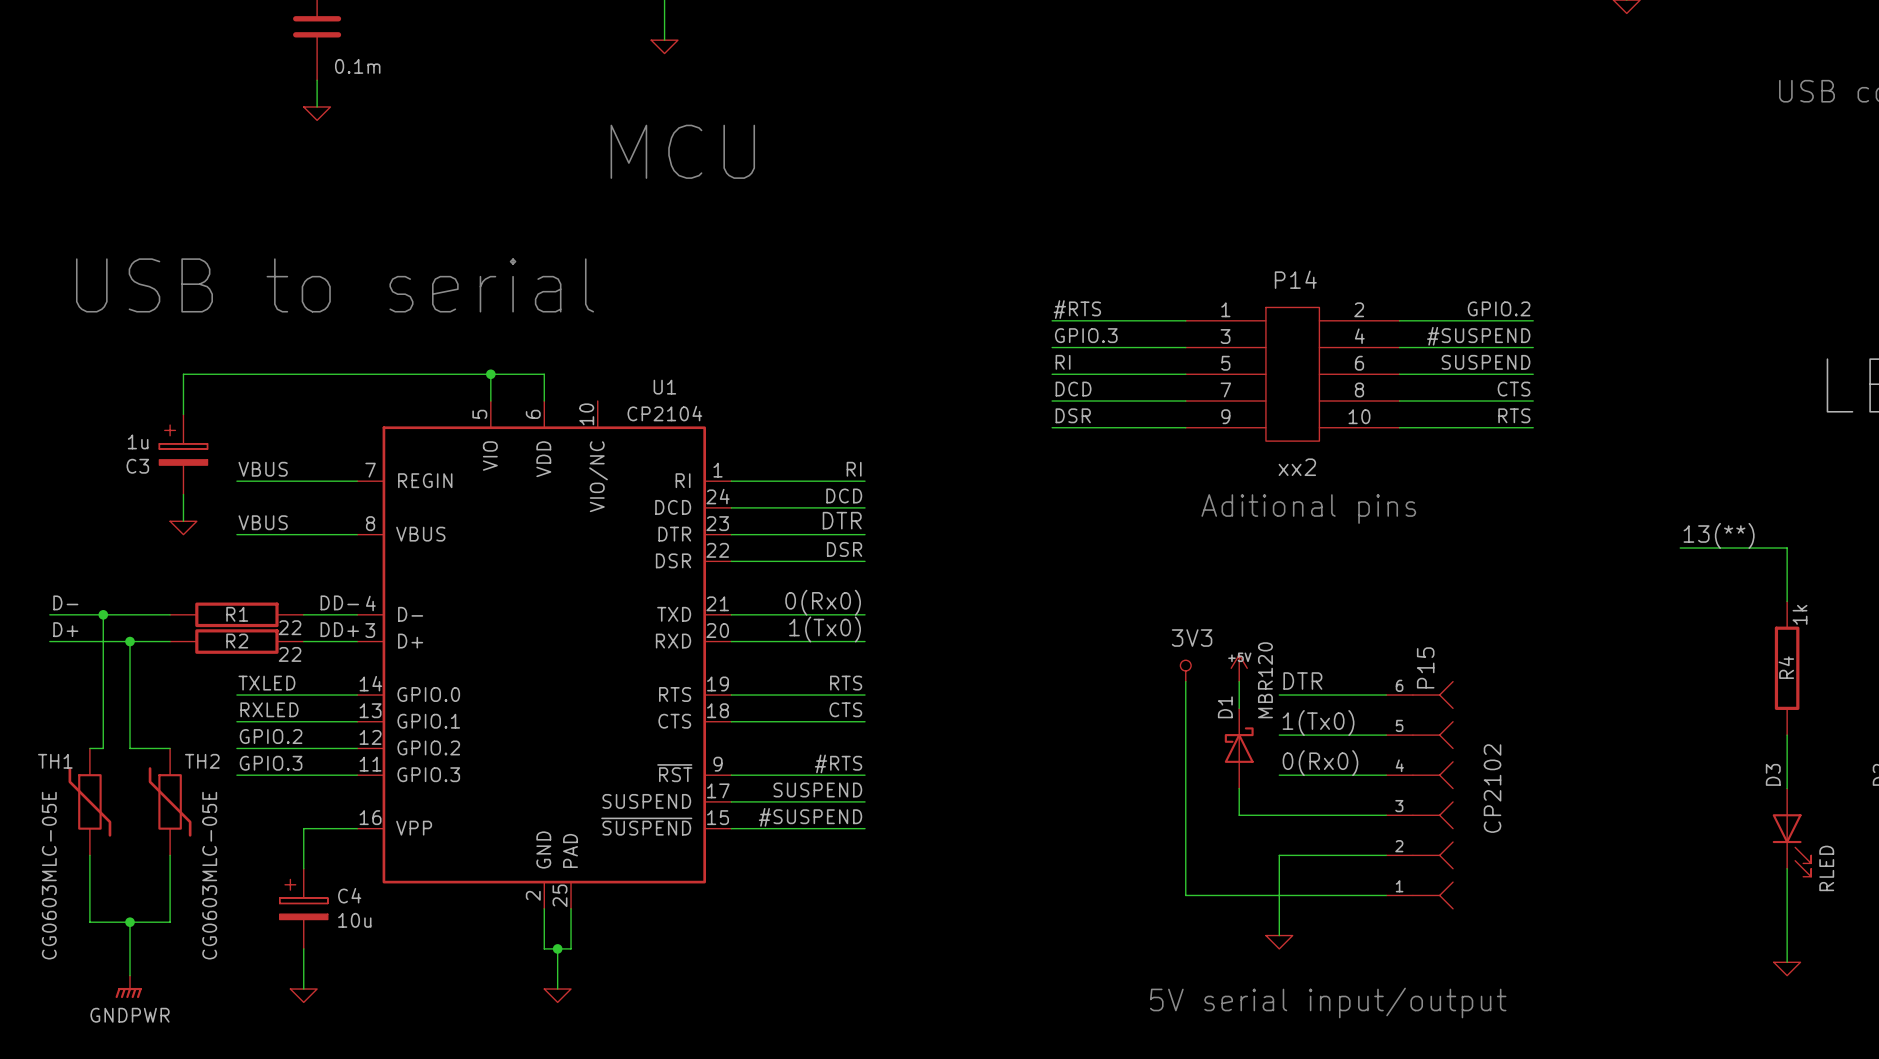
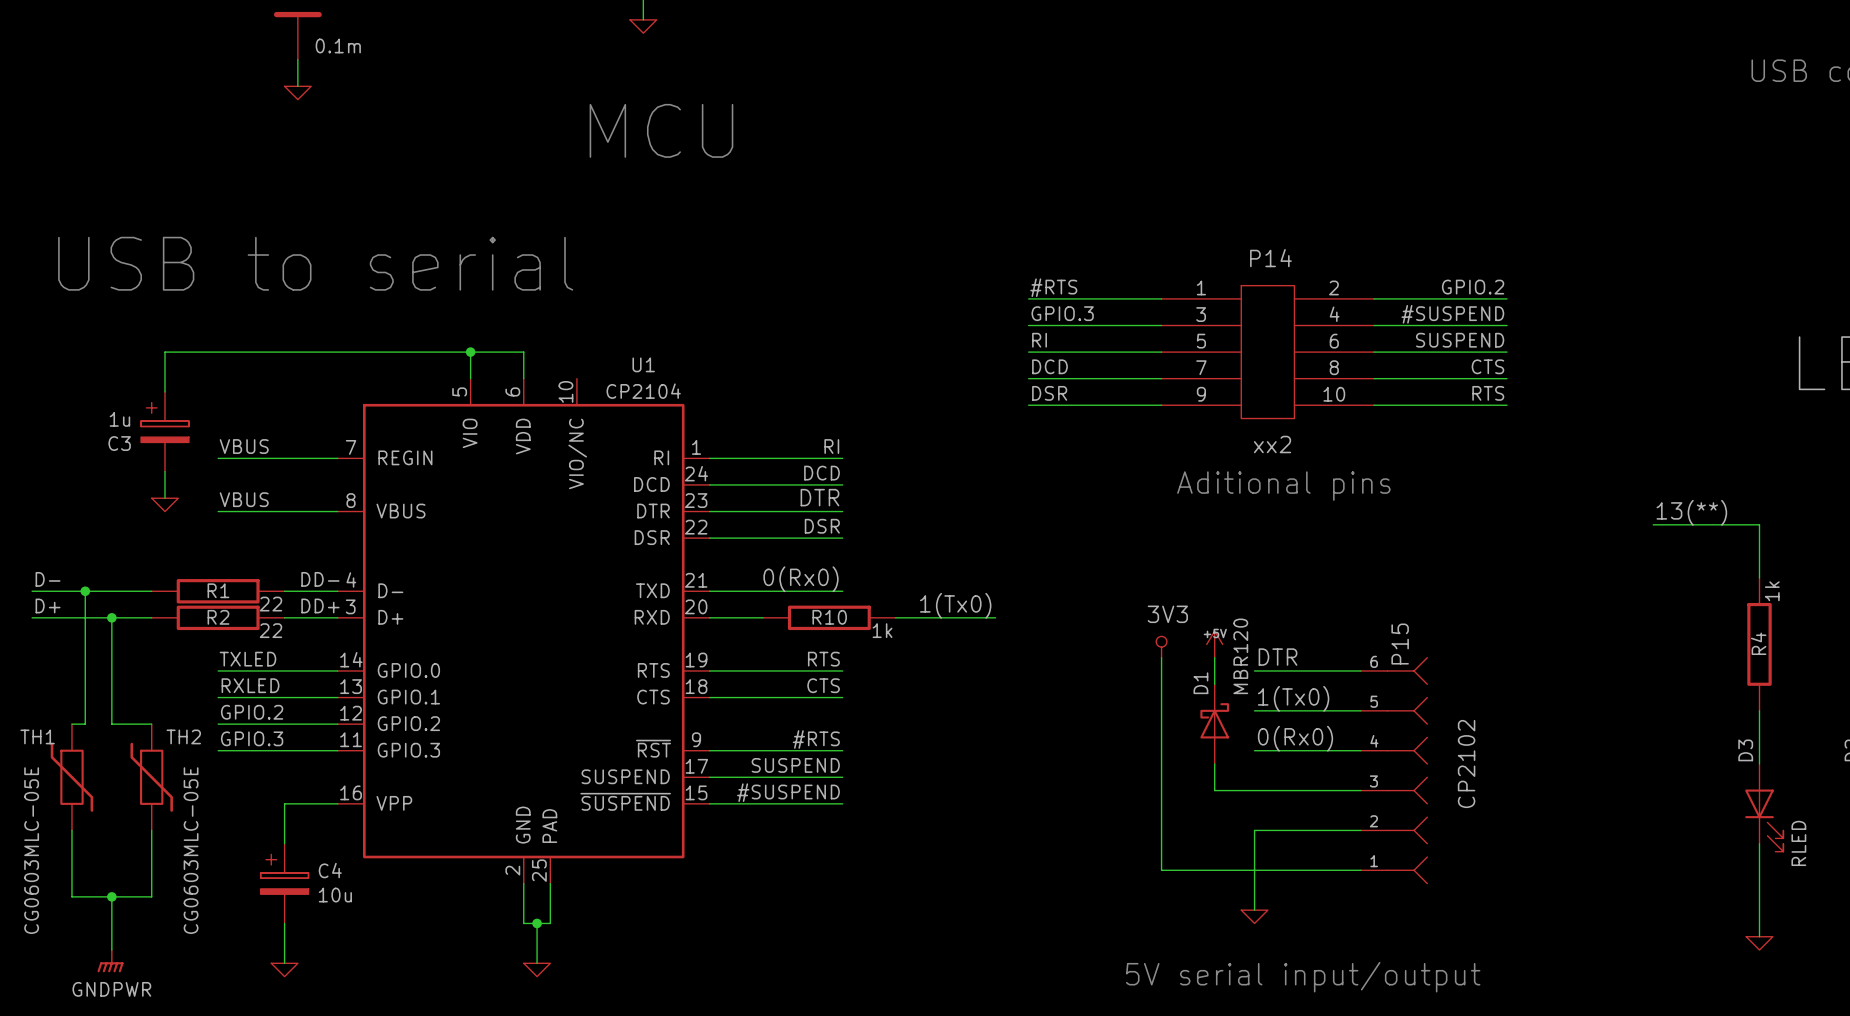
label position: 1(Tx0) (825, 629) -> 1(Tx0) (955, 605)
wire: (784, 641) (865, 641) -> none
R10: none -> 1k (829, 617)
wire: none -> (895, 617) (995, 617)

